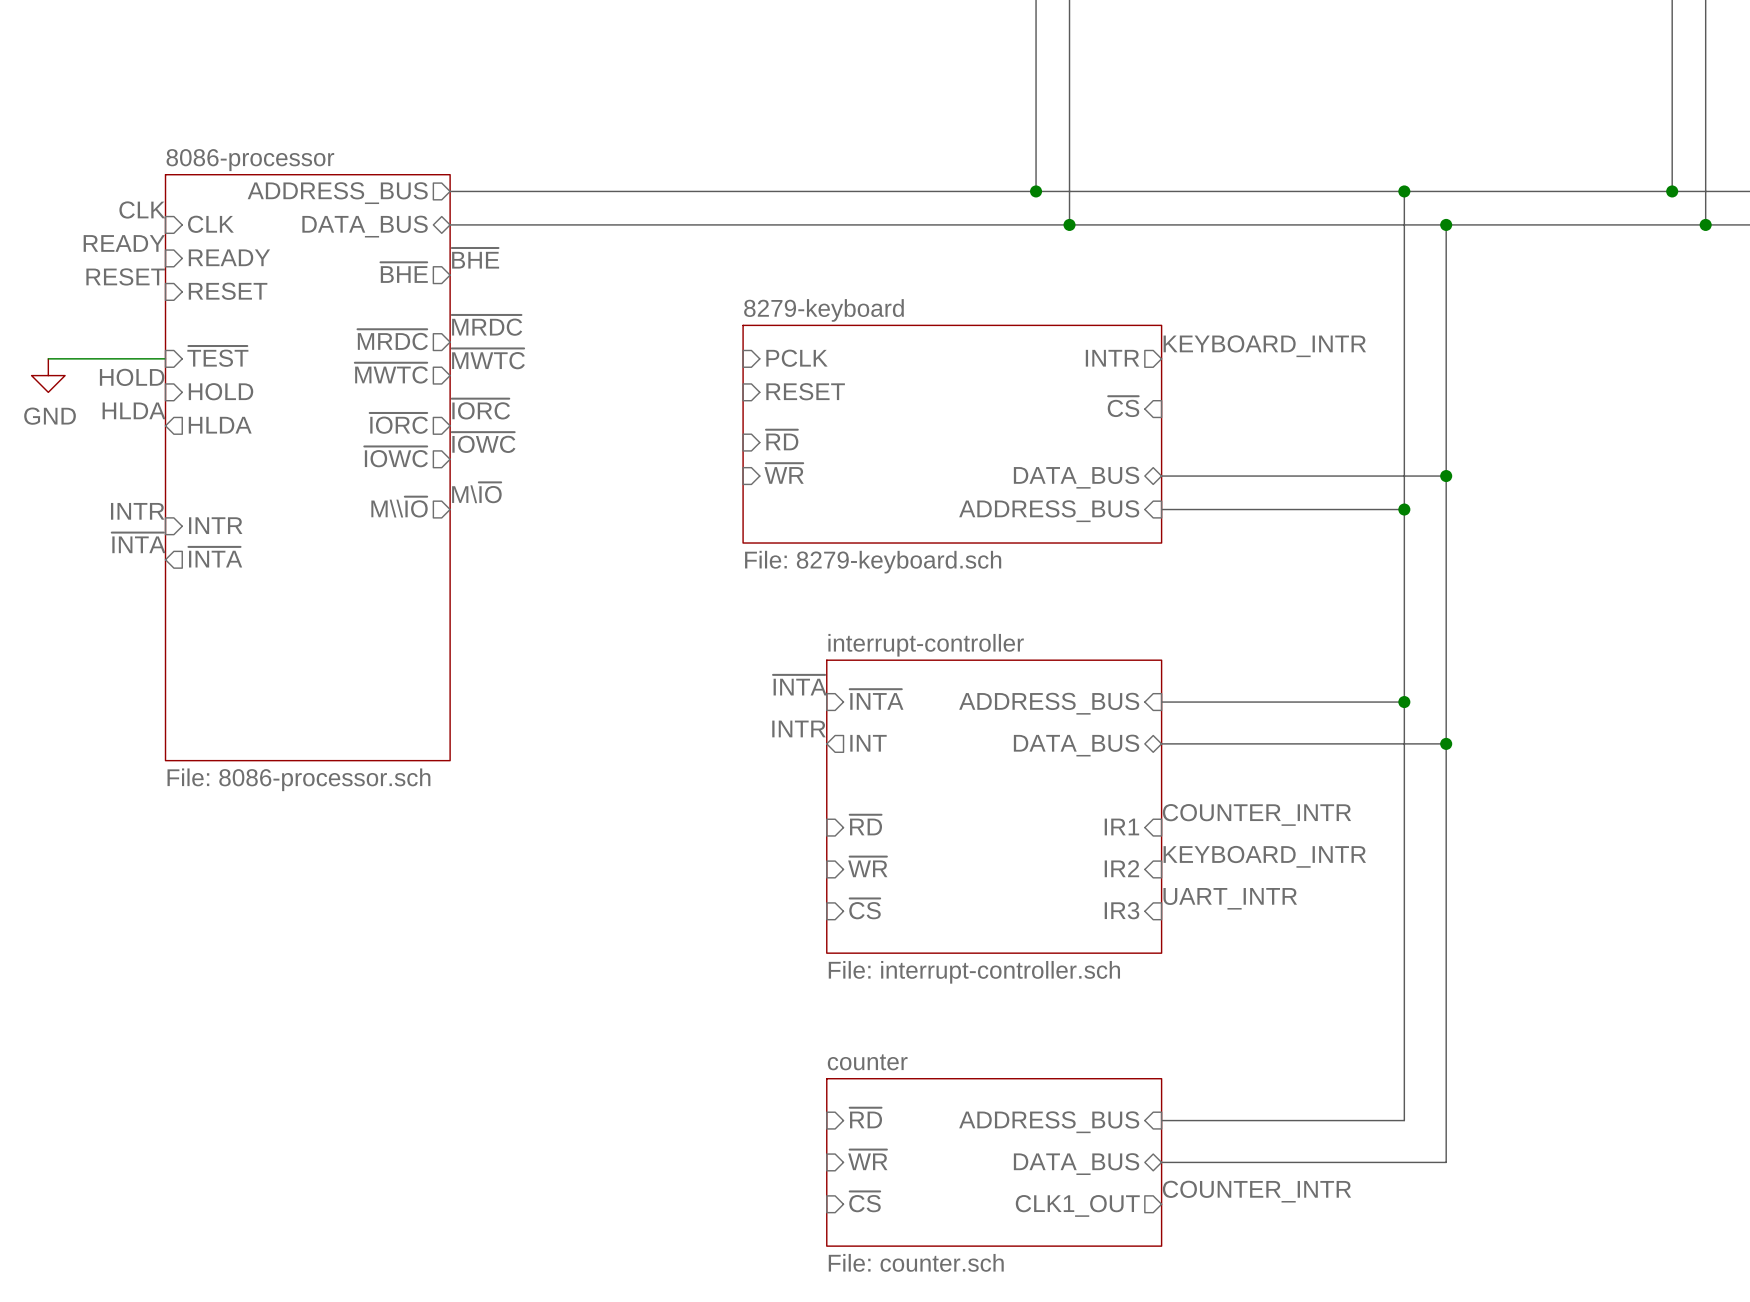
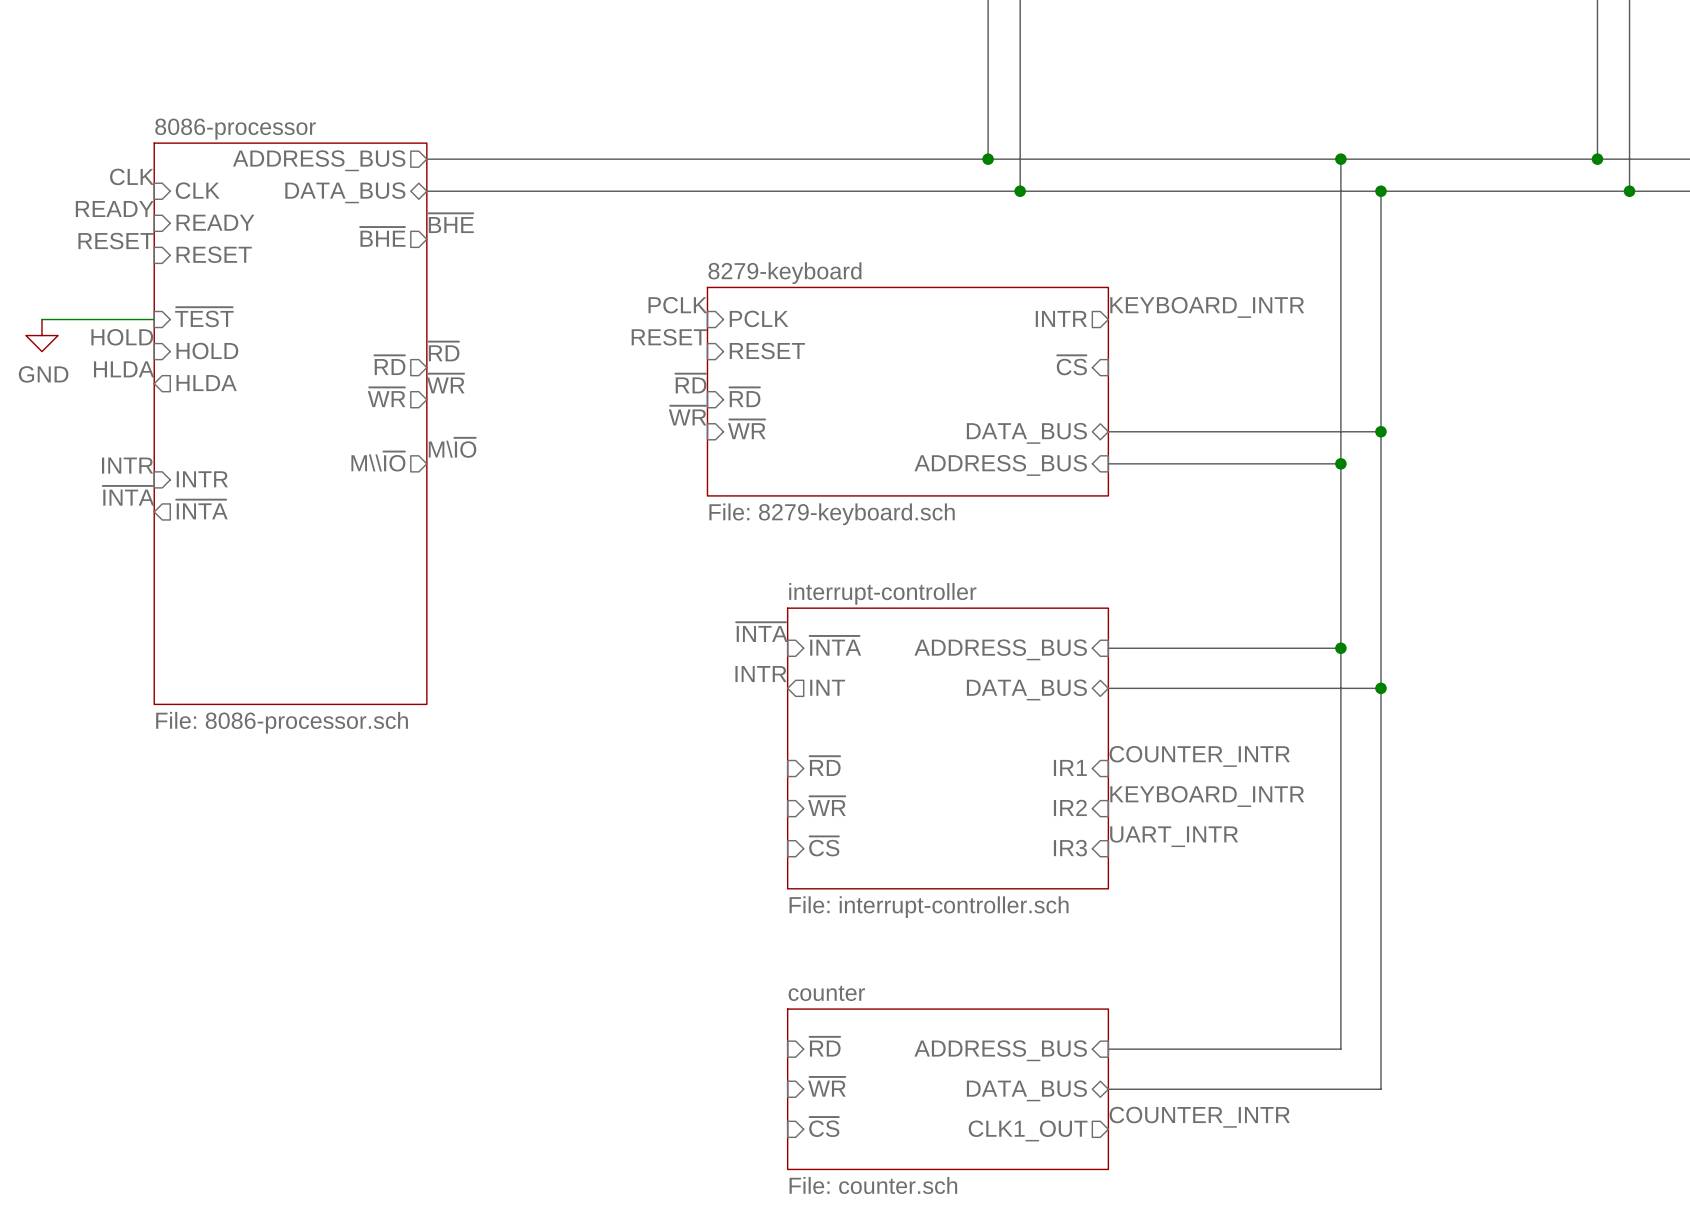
label: ~{MRDC} (486, 325) -> none
sheet pin: ~{MRDC} (392, 339) -> none
label: none -> PCLK (677, 305)
label: ~{MWTC} (488, 358) -> none
sheet pin: ~{MWTC} (391, 373) -> none
label: none -> RESET (669, 337)
label: none -> ~{RD} (443, 351)
sheet pin: none -> ~{RD} (389, 365)
label: ~{IORC} (480, 409) -> none
sheet pin: ~{IORC} (398, 423) -> none
label: none -> ~{WR} (445, 383)
label: none -> ~{RD} (690, 383)
sheet pin: none -> ~{WR} (386, 397)
label: ~{IOWC} (483, 442) -> none
sheet pin: ~{IOWC} (396, 456) -> none
label: none -> ~{WR} (687, 415)

